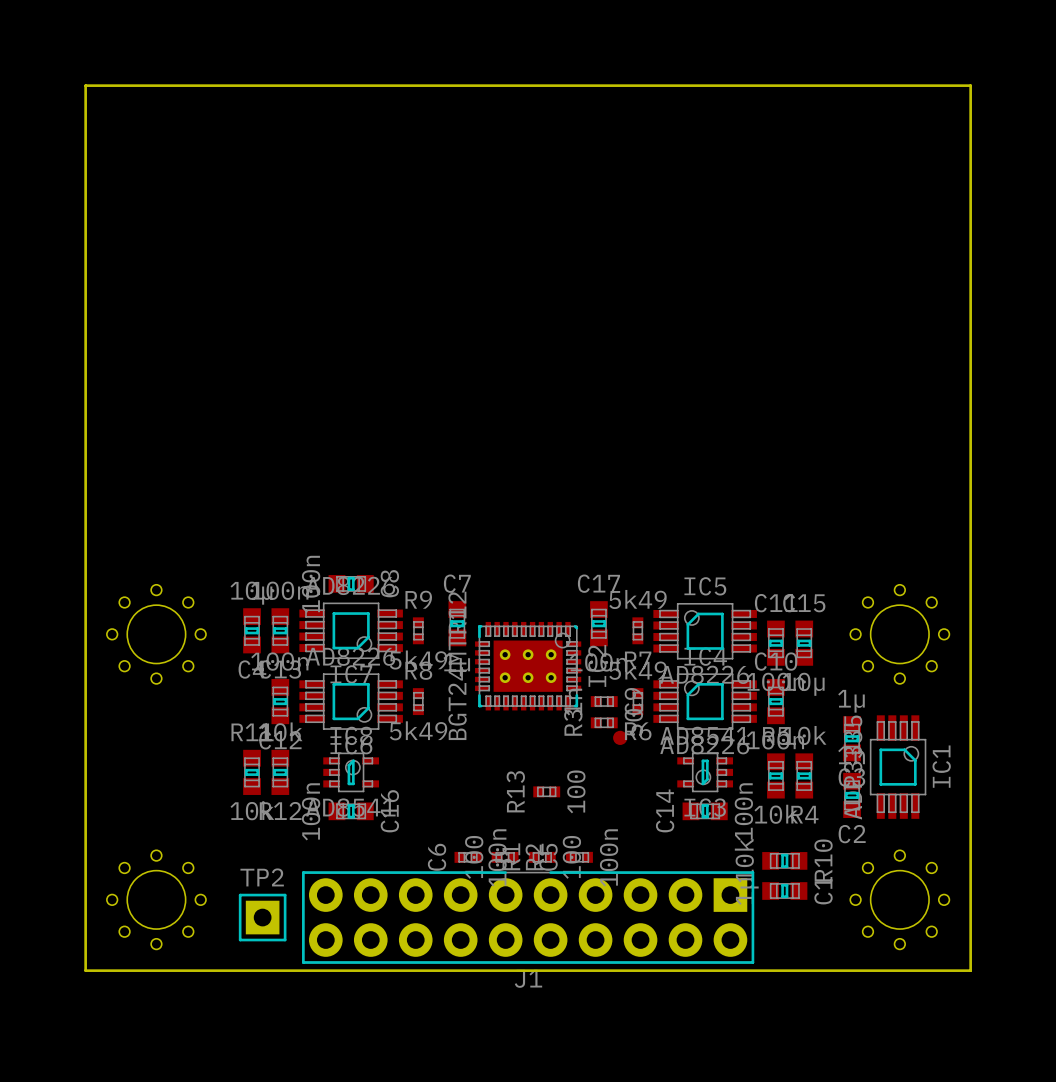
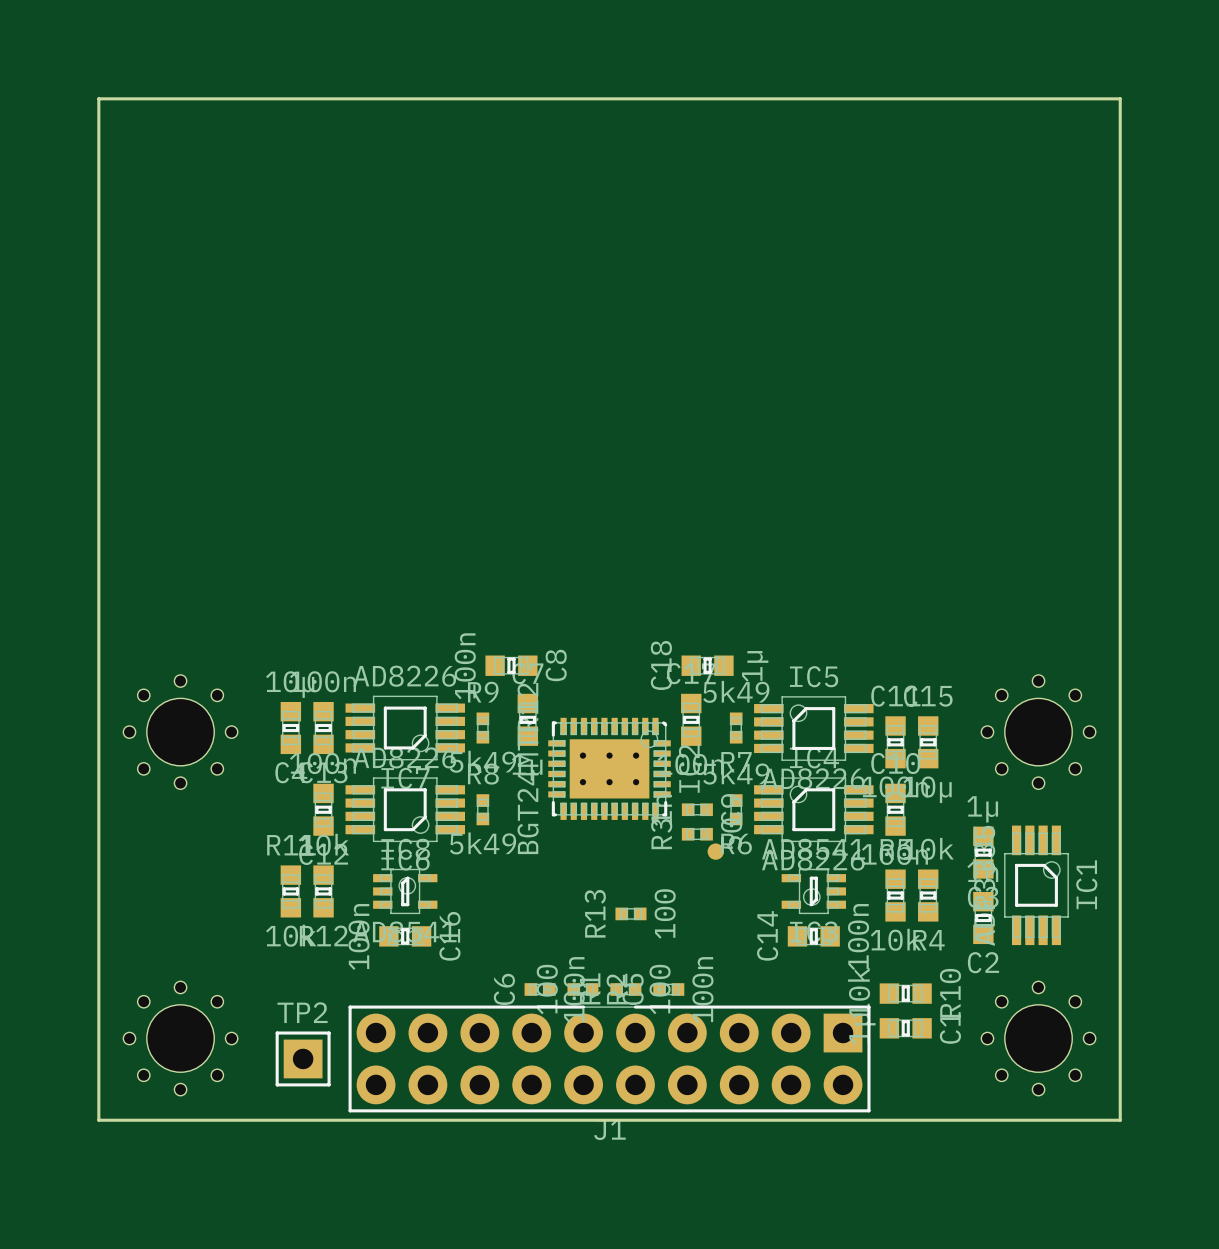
C18: none -> 1µ (707, 665)
C8 position: (351, 583) -> (511, 665)

